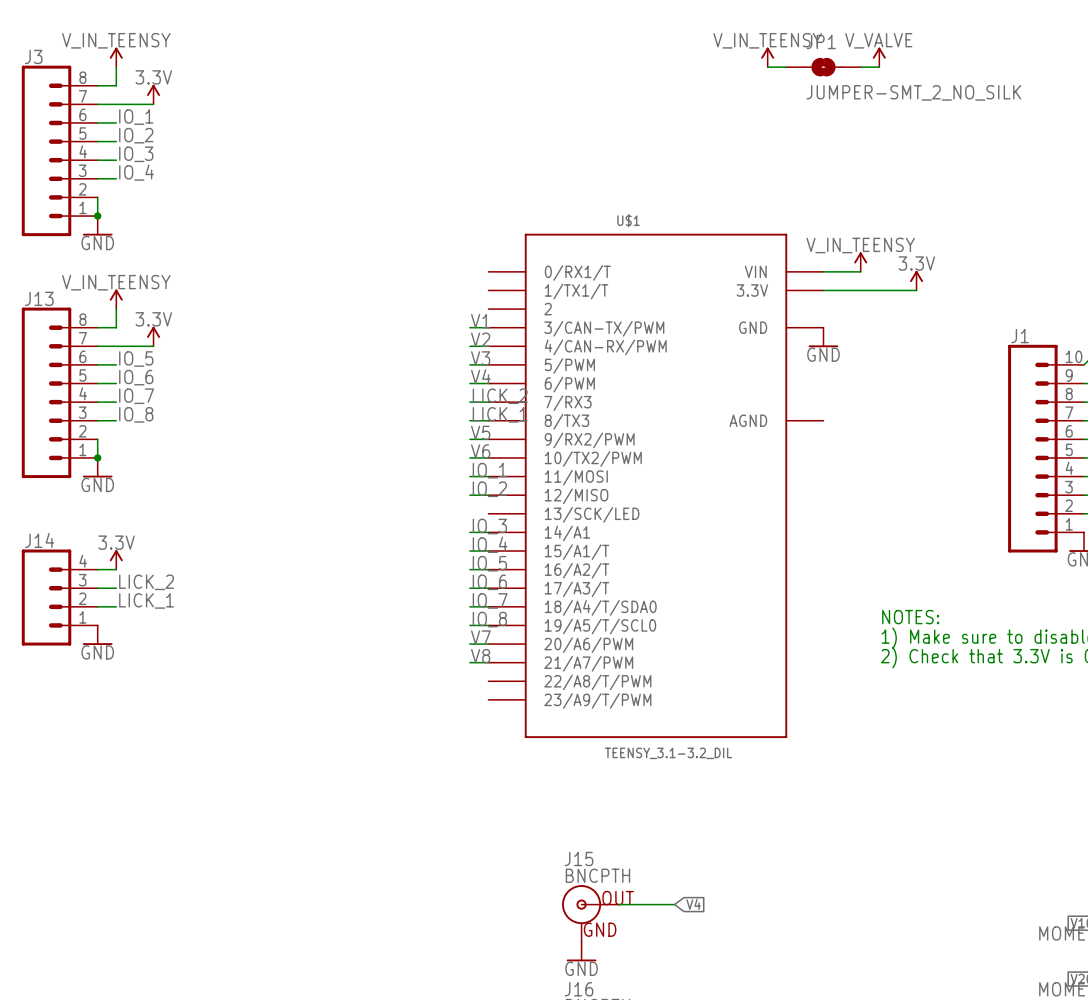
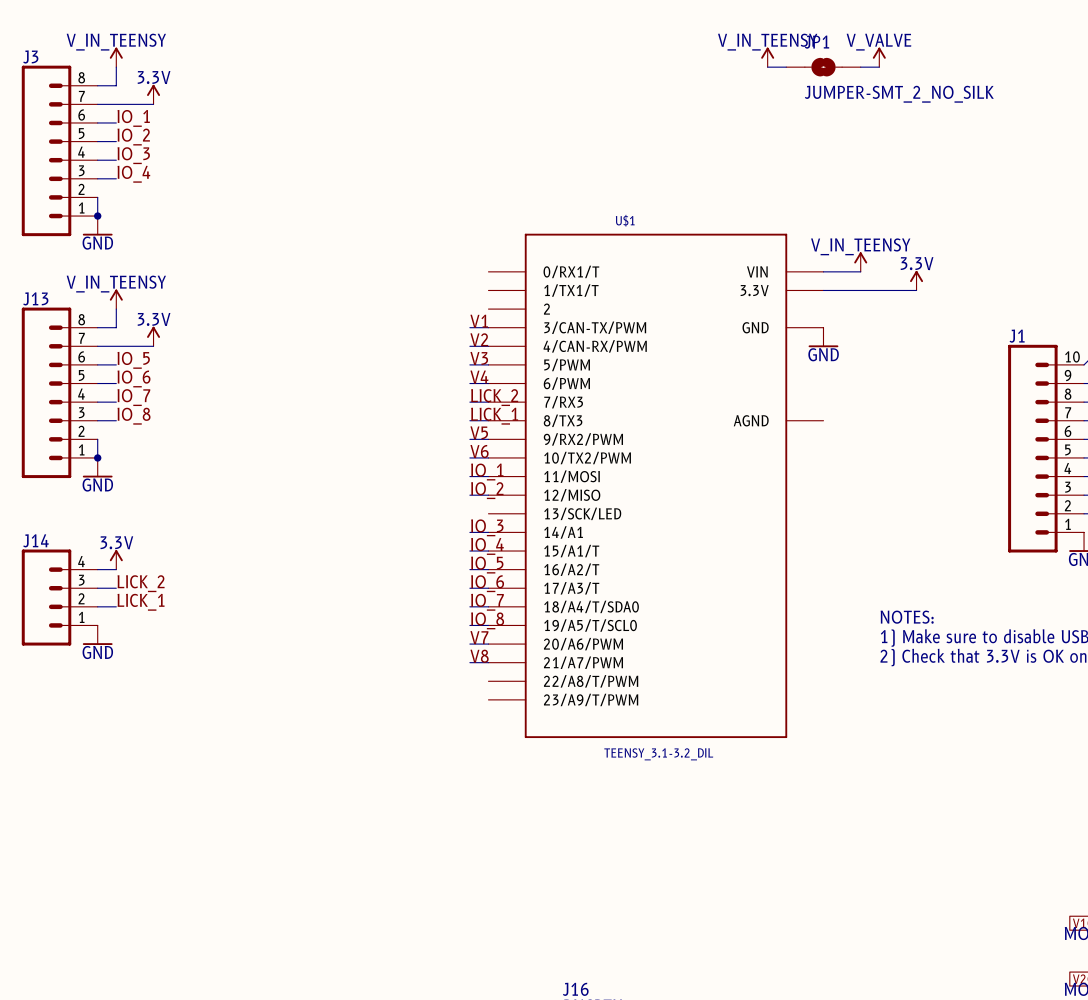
wire: (618, 904) (674, 904) -> none
global label: V4 (693, 904) -> none
J15: BNCPTH (590, 913) -> none
power symbol: GND (581, 951) -> none

